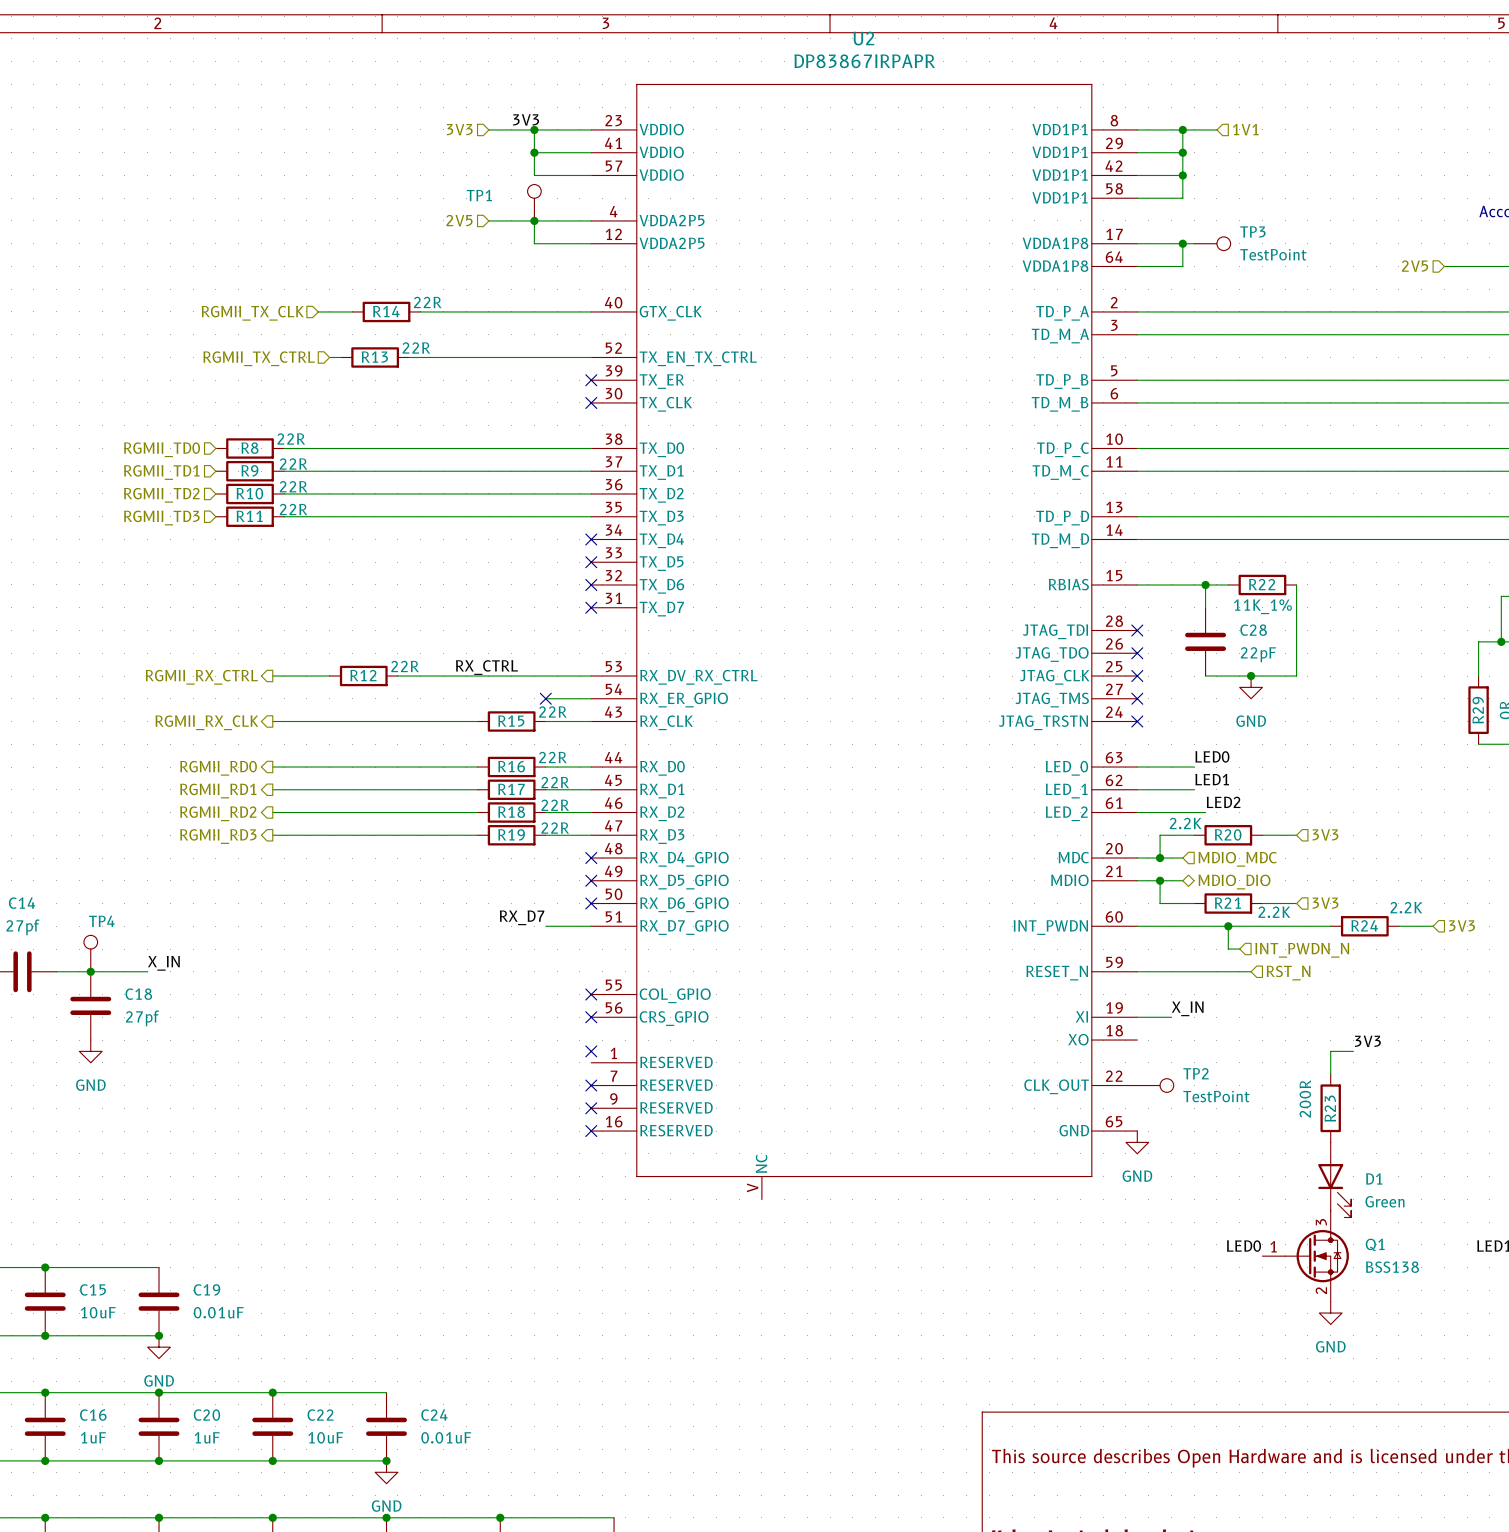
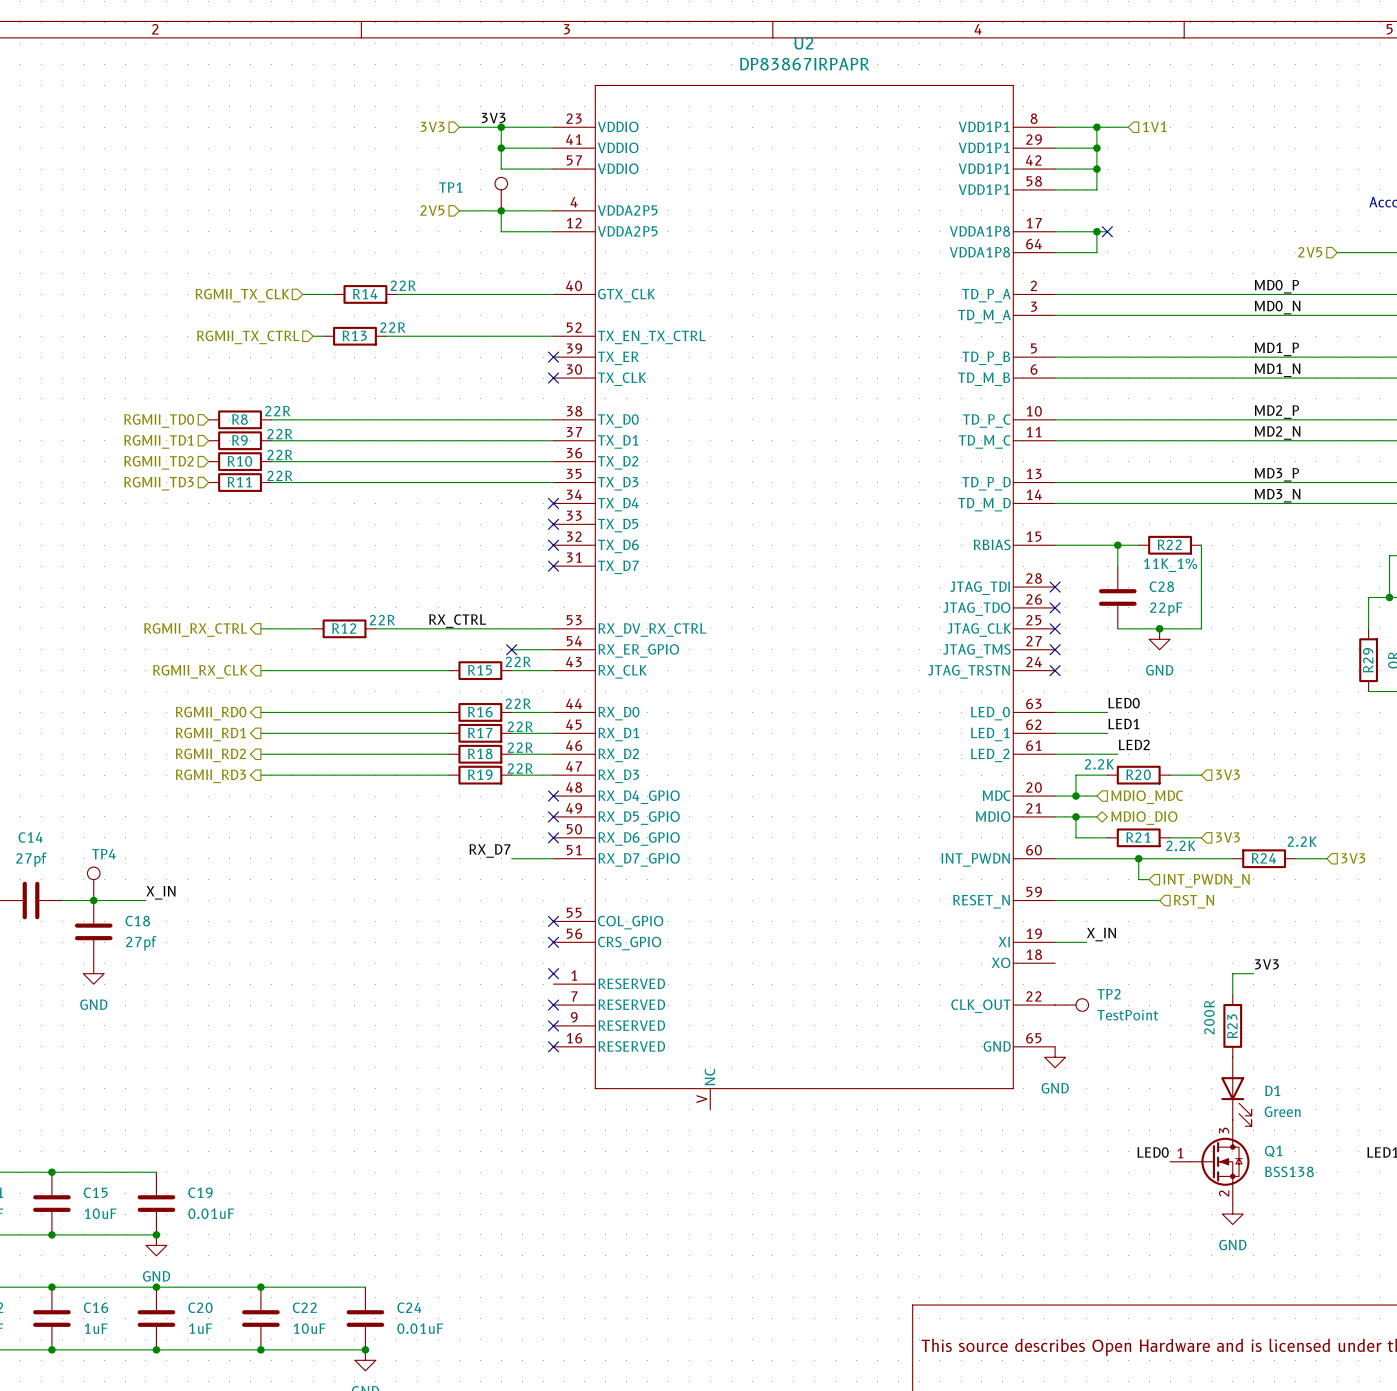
no-connect mark: none -> (1107, 231)
TP3: TestPoint (1212, 243) -> none
label: none -> MD0_P (1276, 286)
label: none -> MD0_N (1277, 307)
label: none -> MD1_P (1276, 349)
label: none -> MD1_N (1277, 370)
label: none -> MD2_P (1276, 412)
label: none -> MD2_N (1277, 432)
label: none -> MD3_P (1276, 474)
label: none -> MD3_N (1277, 495)

